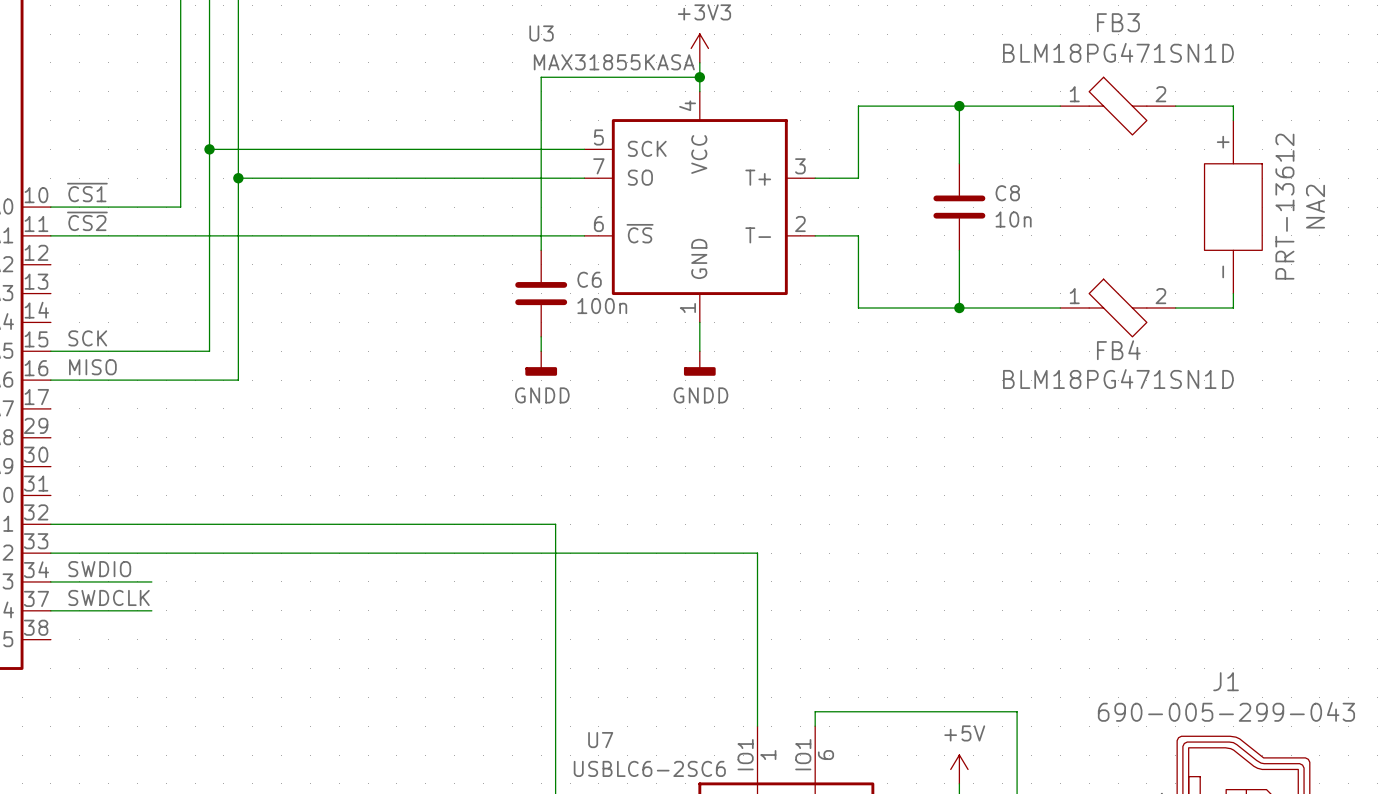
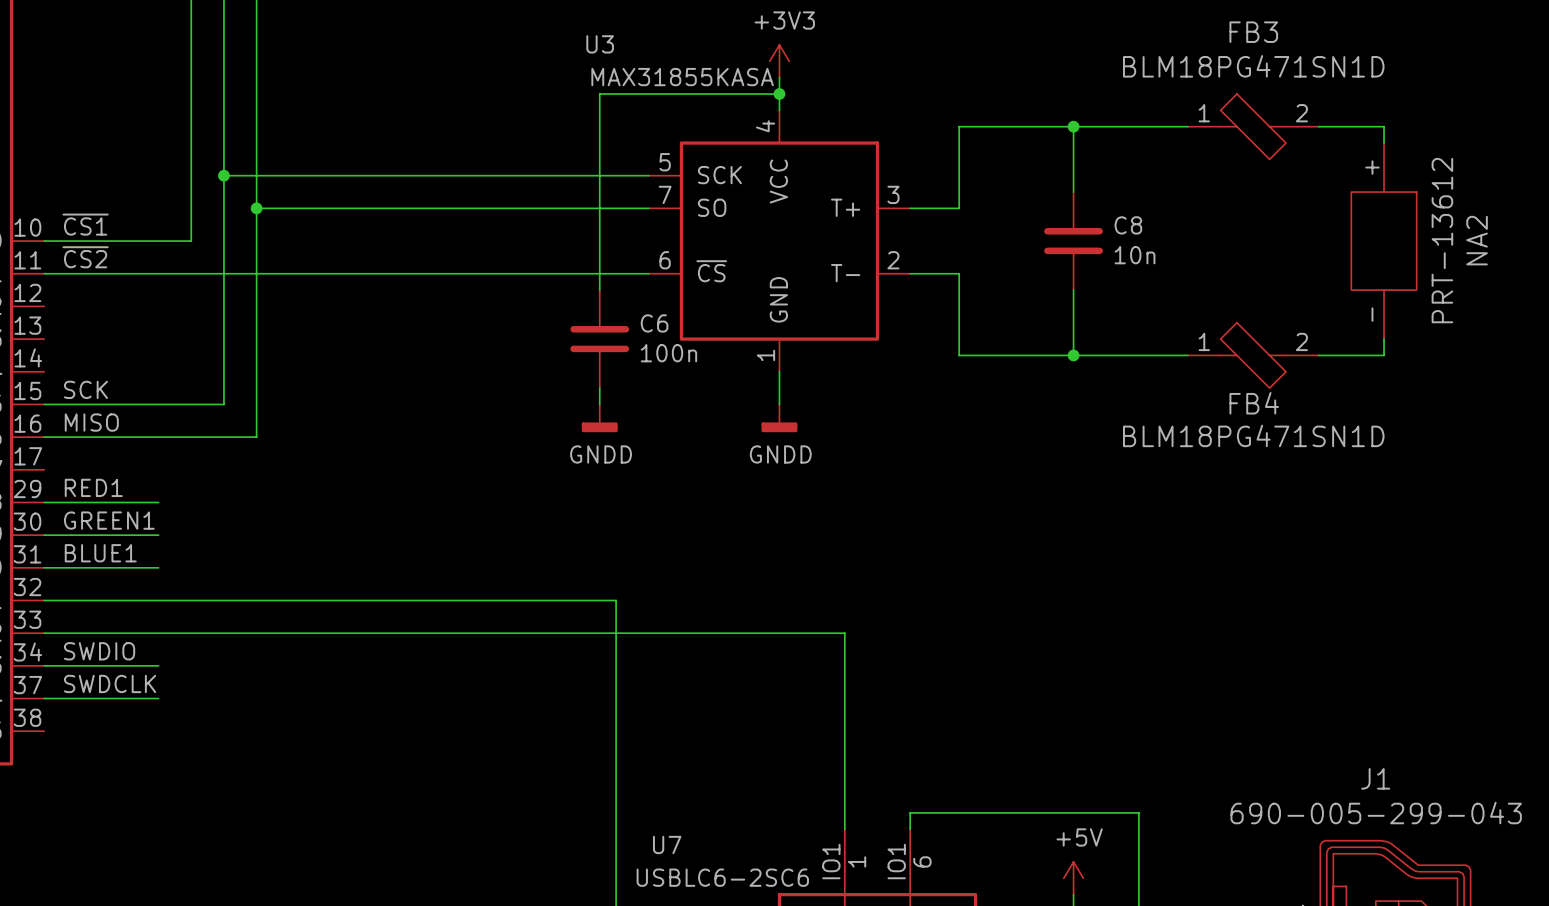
label: none -> RED1 (93, 487)
wire: none -> (44, 502) (158, 502)
label: none -> GREEN1 (109, 520)
wire: none -> (44, 535) (158, 535)
label: none -> BLUE1 (100, 553)
wire: none -> (44, 567) (158, 567)

